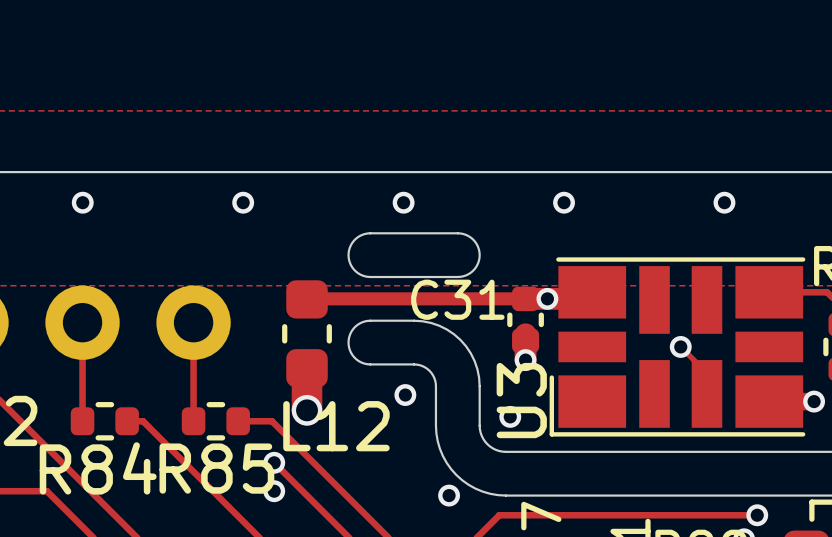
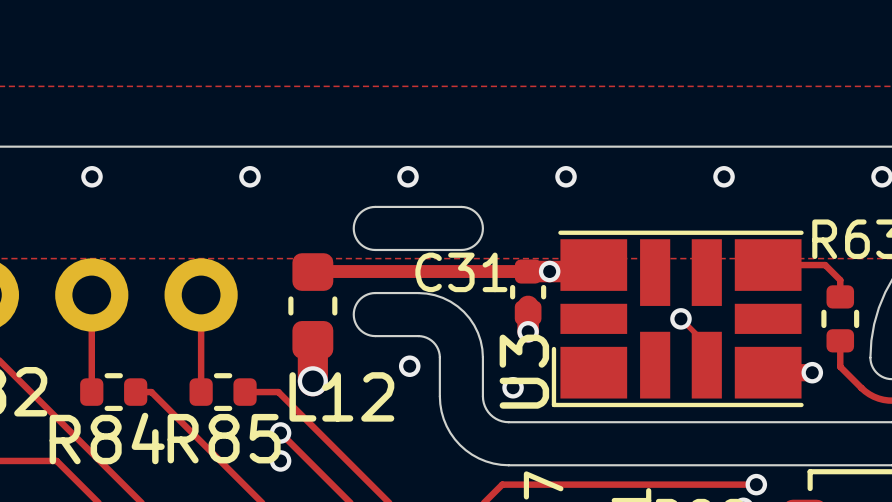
via: (449, 495) -> none

